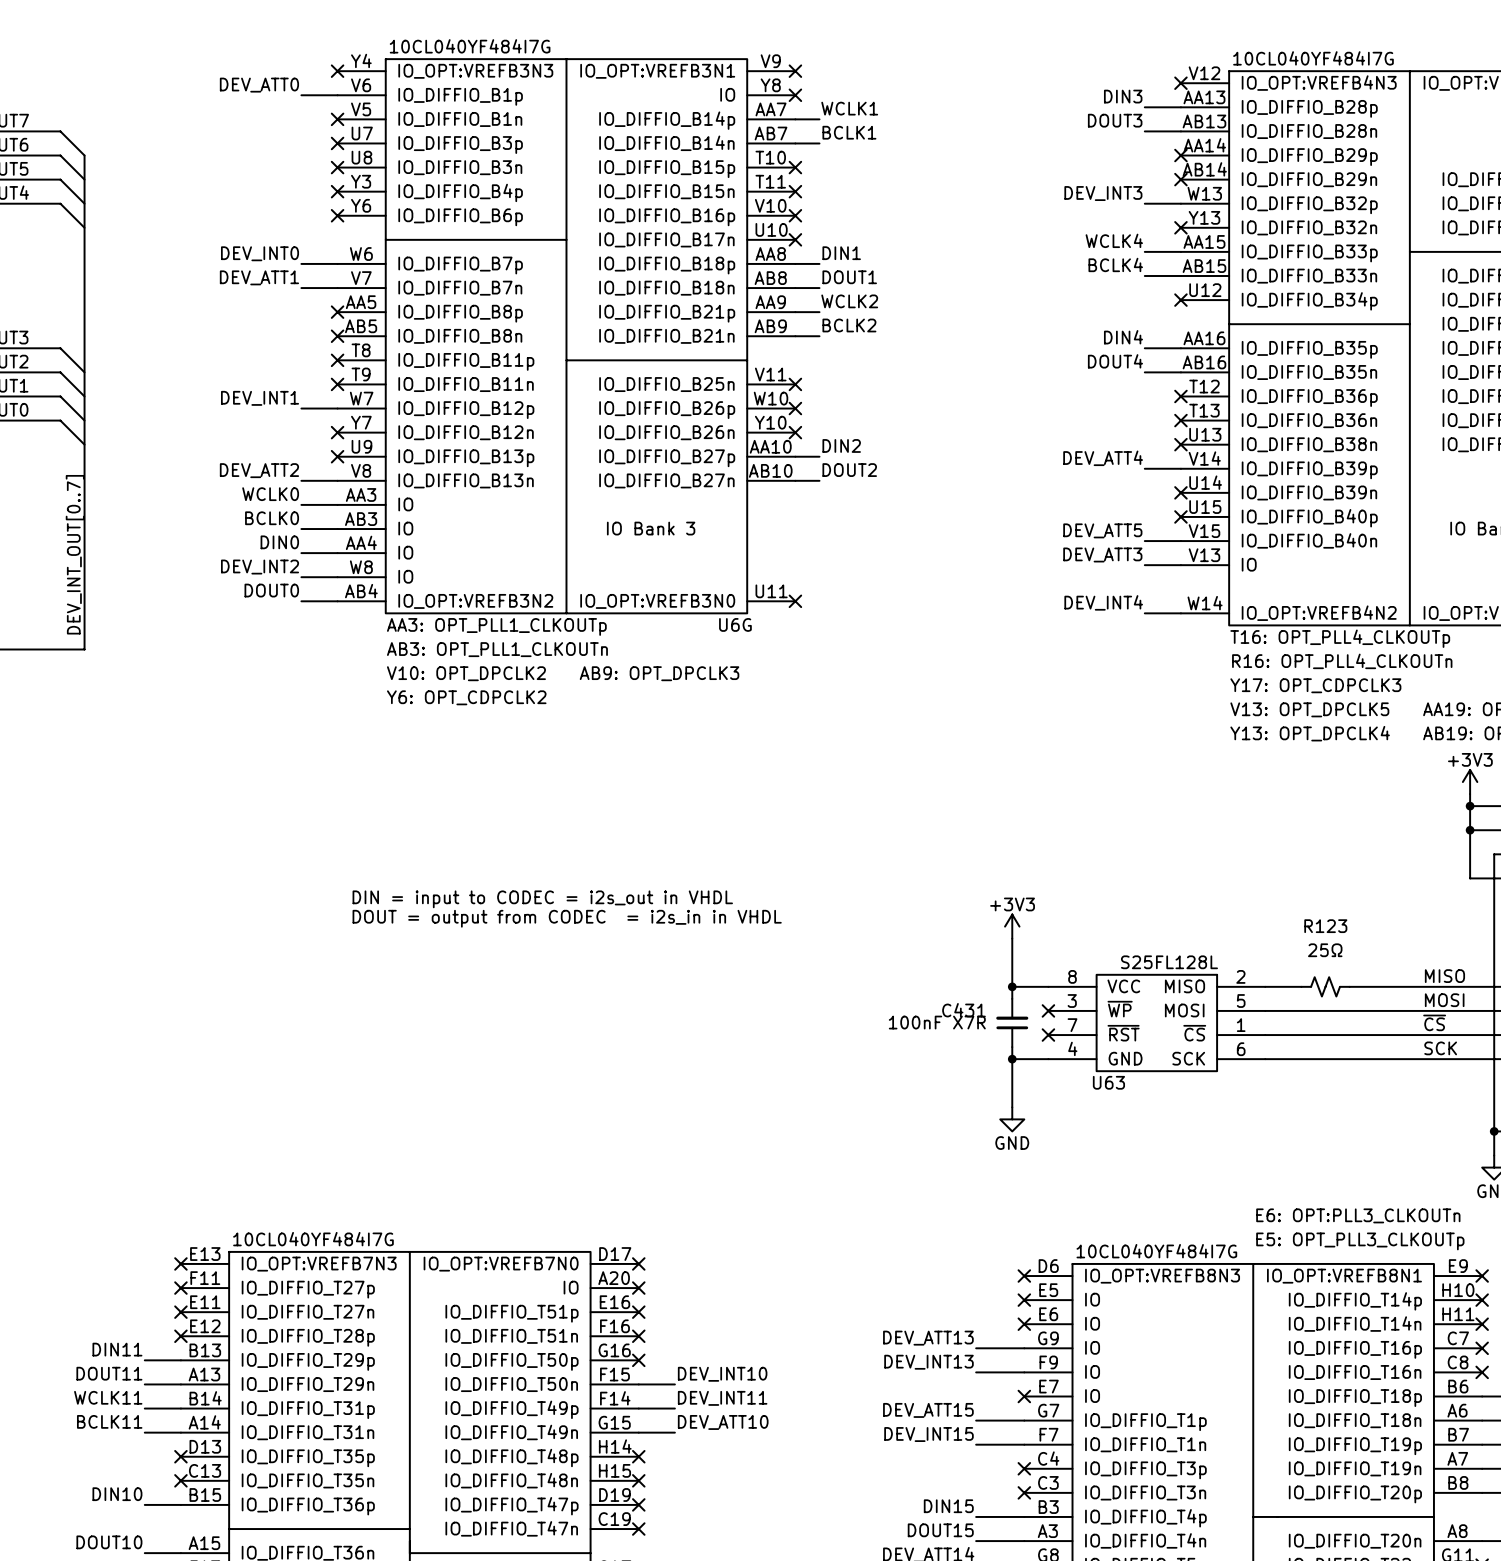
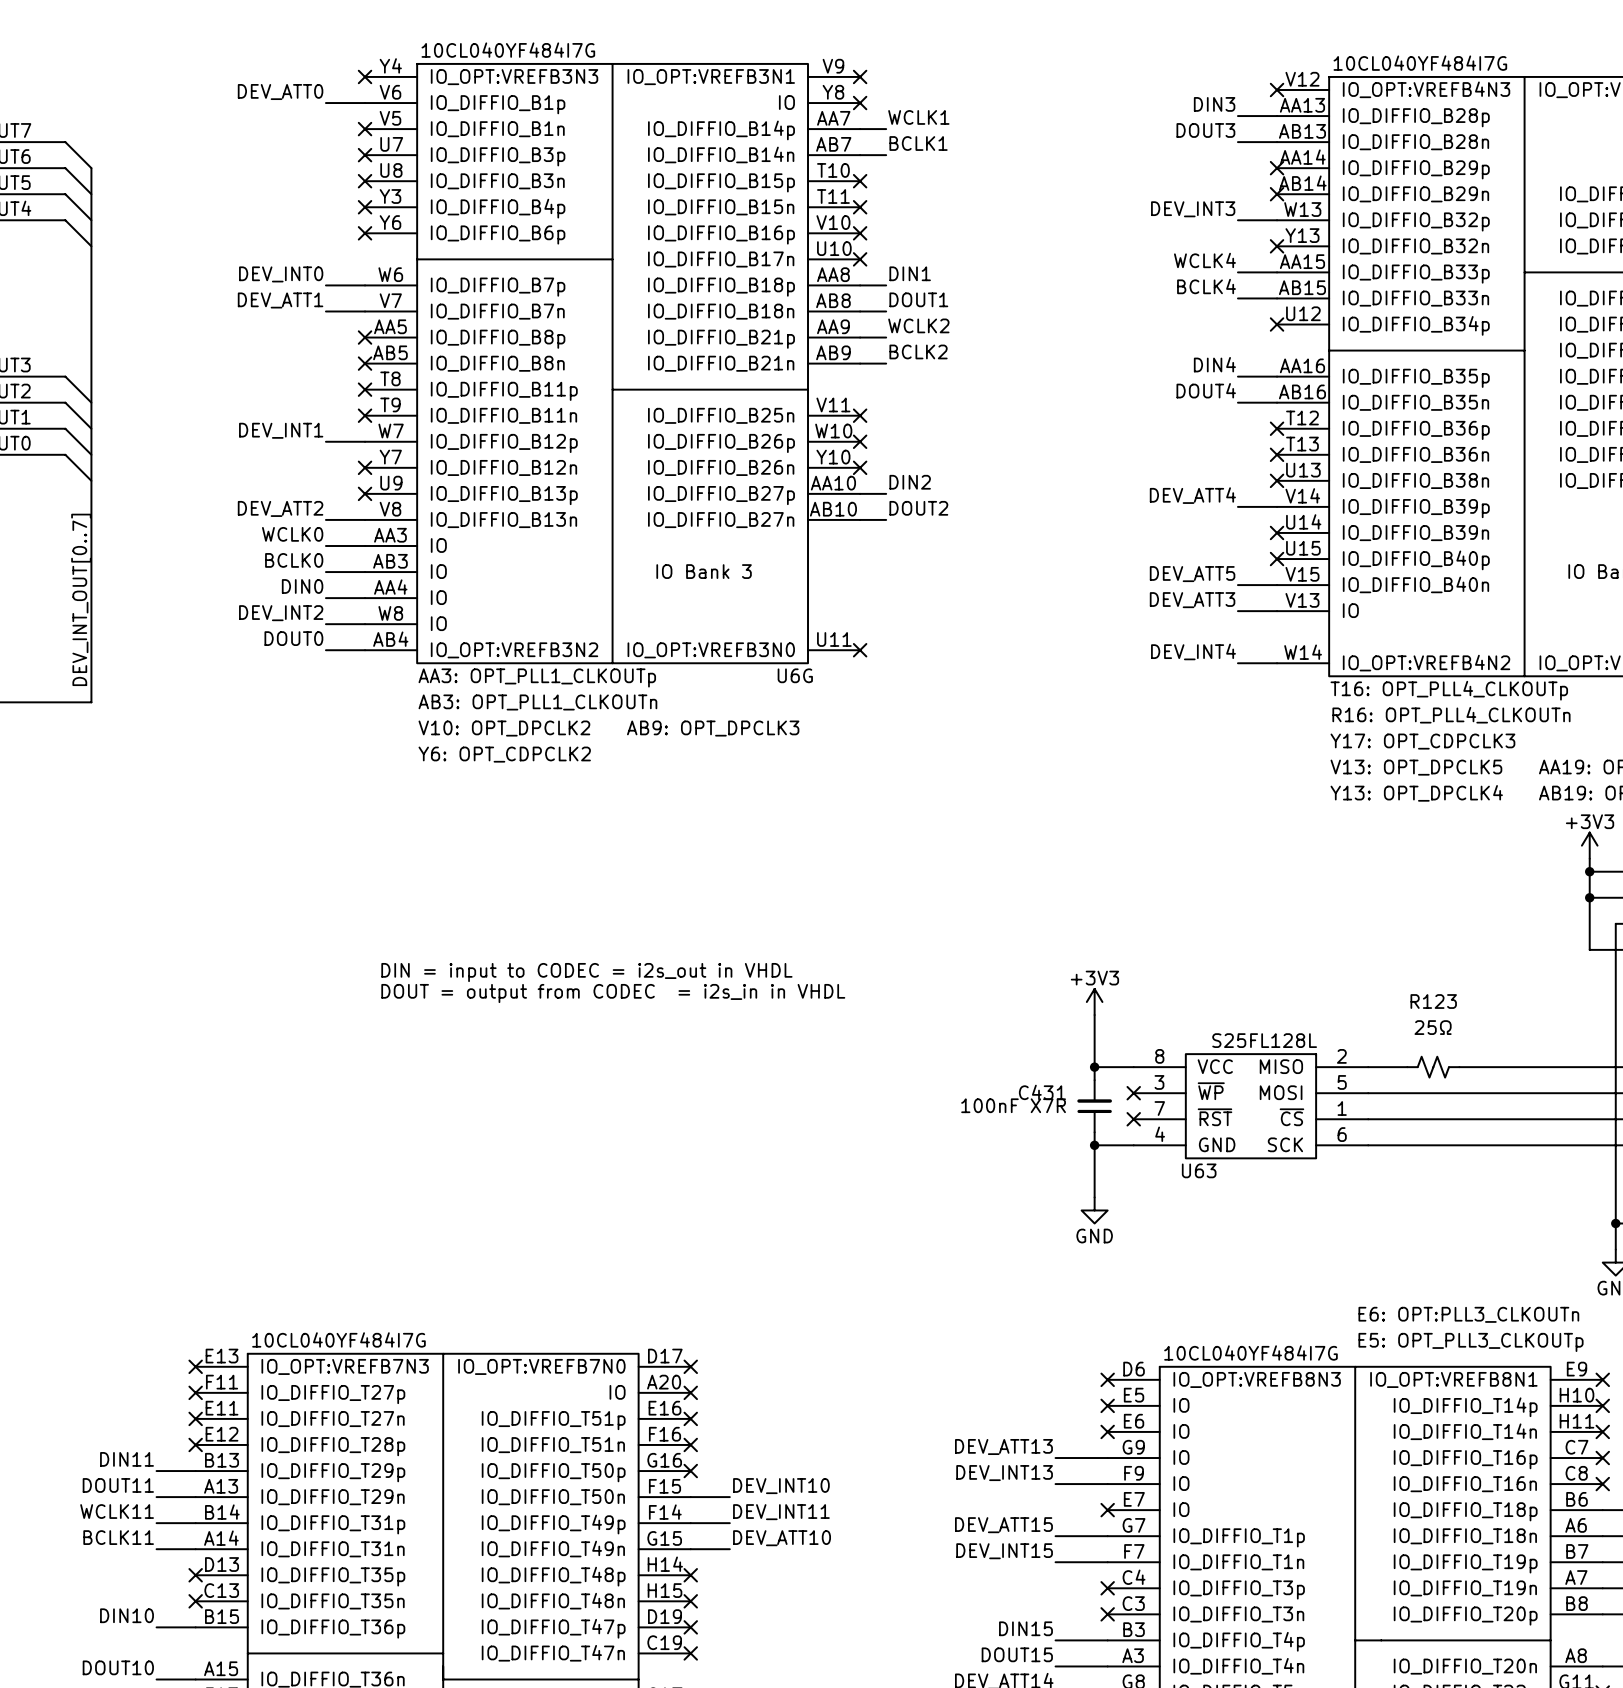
label: MISO (1444, 976) -> none
label: MOSI (1444, 1000) -> none
label: ~{CS} (1434, 1022) -> none
label: SCK (1440, 1048) -> none

